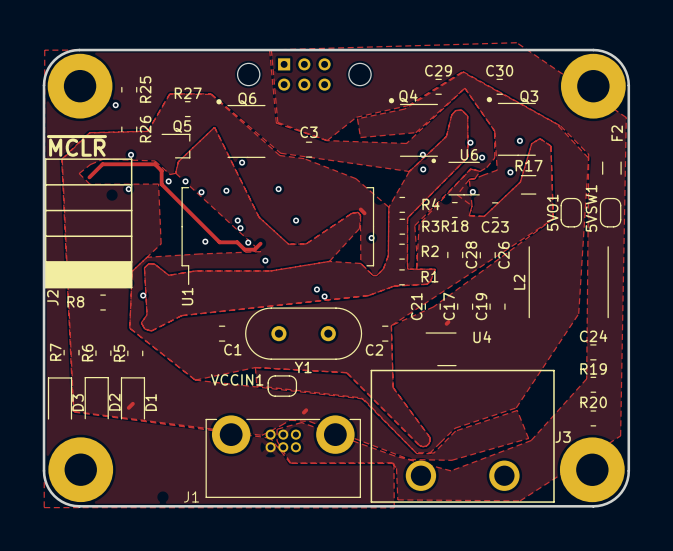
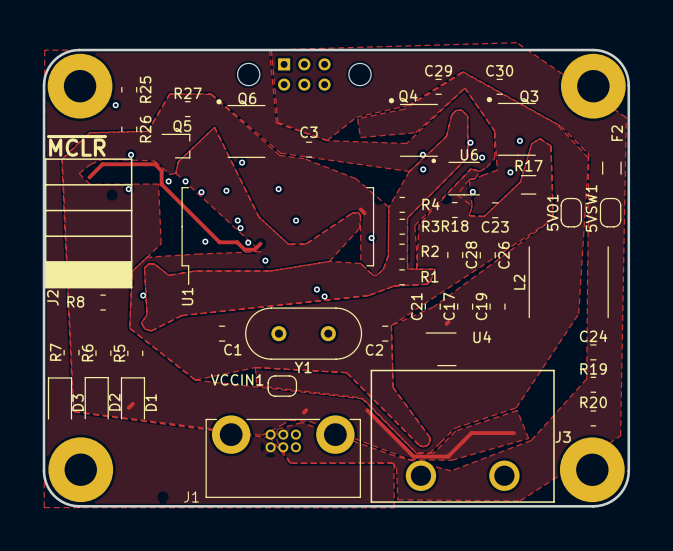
track: none -> (367, 410) (413, 456) (448, 456) (471, 433) (513, 433)

